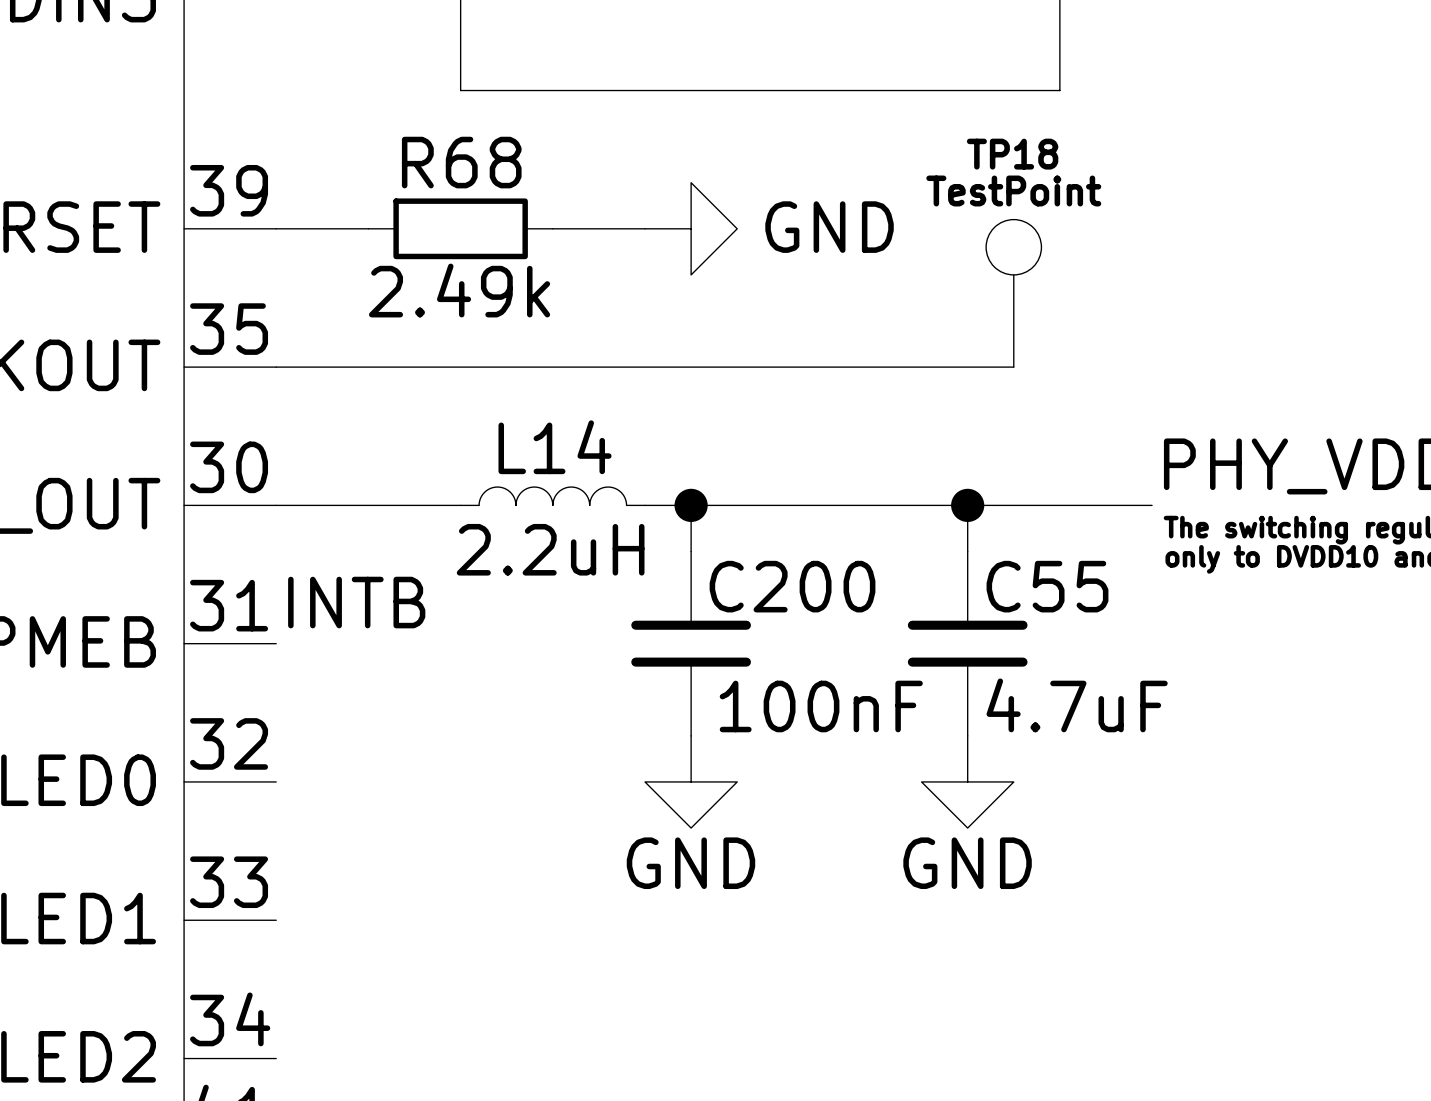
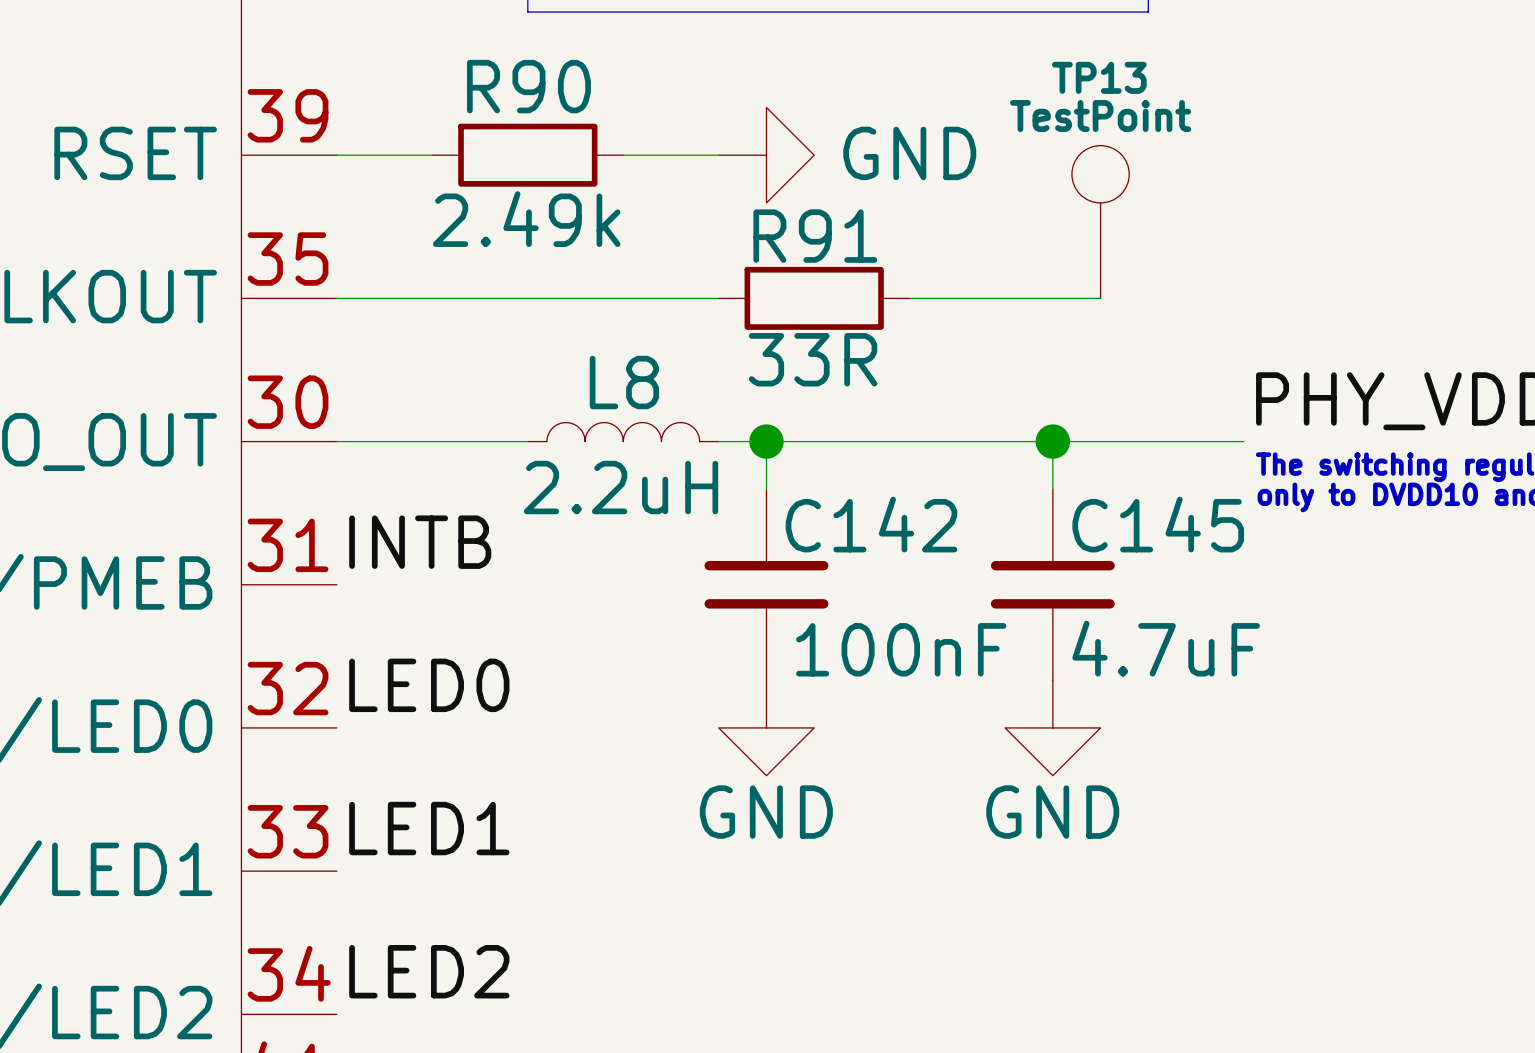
TP18 name: TP18 (1012, 154) -> TP13 (1099, 77)
R68 name: R68 (461, 162) -> R90 (528, 86)
wire: (645, 367) (829, 367) -> none
R91: none -> (814, 298)
L14 name: L14 (555, 447) -> L8 (624, 382)
C200 name: C200 (792, 586) -> C142 (871, 524)
C55 name: C55 (1047, 586) -> C145 (1158, 524)
label: none -> LED0 (429, 685)
label: none -> LED1 (429, 828)
label: none -> LED2 (429, 971)

